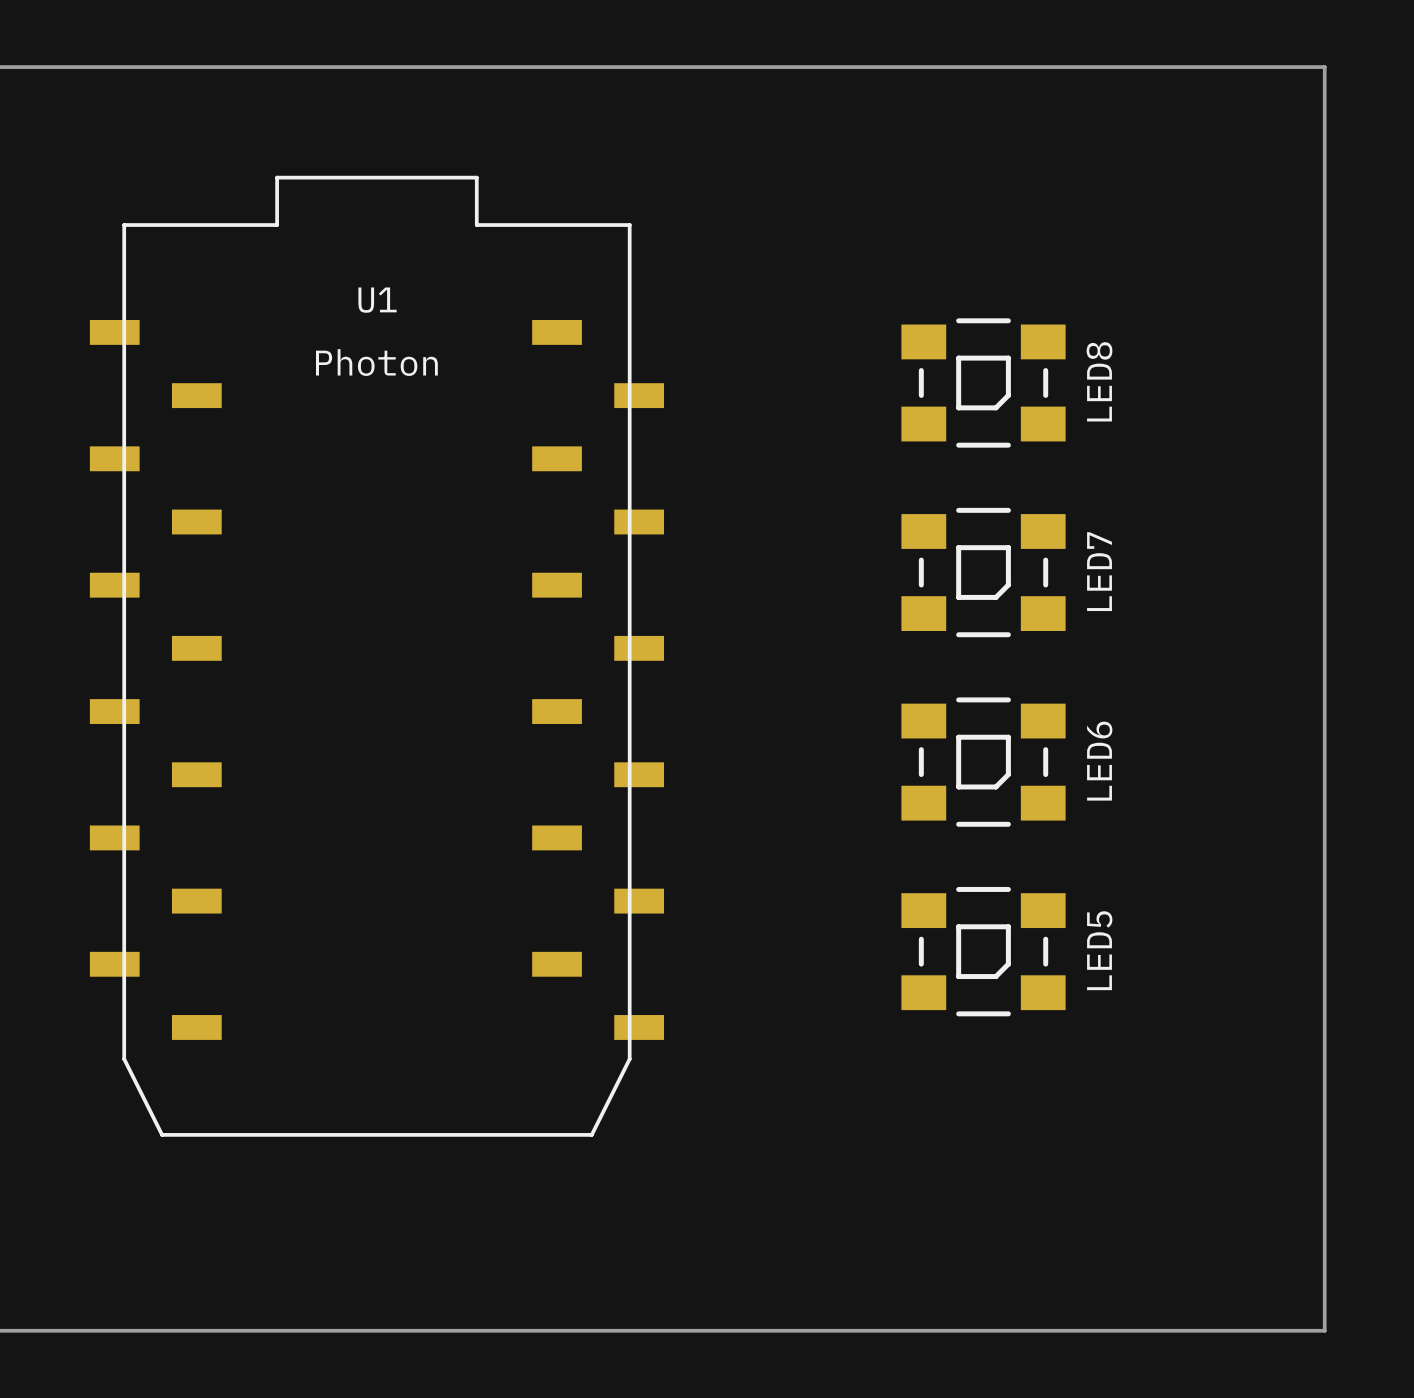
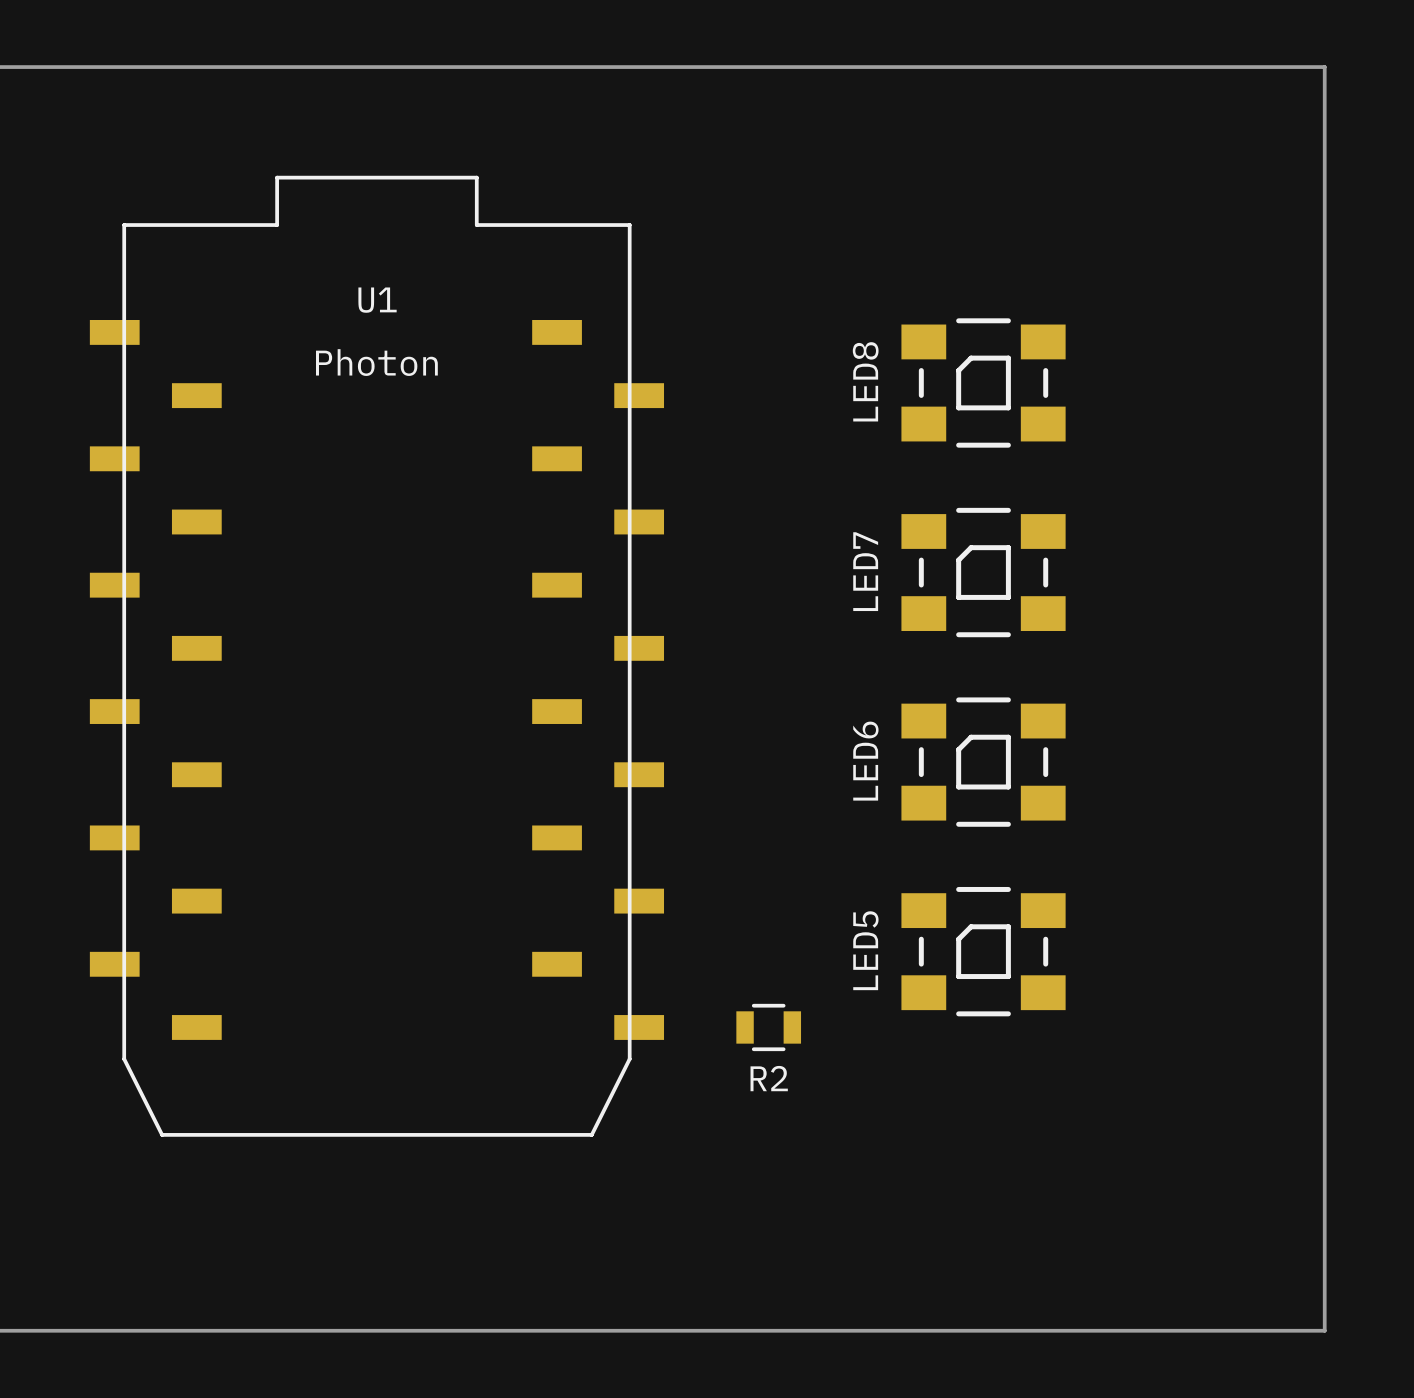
LED8 rotation: 0° (983, 382) -> 180° (983, 382)
LED7 rotation: 0° (983, 572) -> 180° (983, 572)
LED6 rotation: 0° (983, 762) -> 180° (983, 762)
LED5 rotation: 0° (983, 951) -> 180° (983, 951)
R2: none -> (768, 1027)

